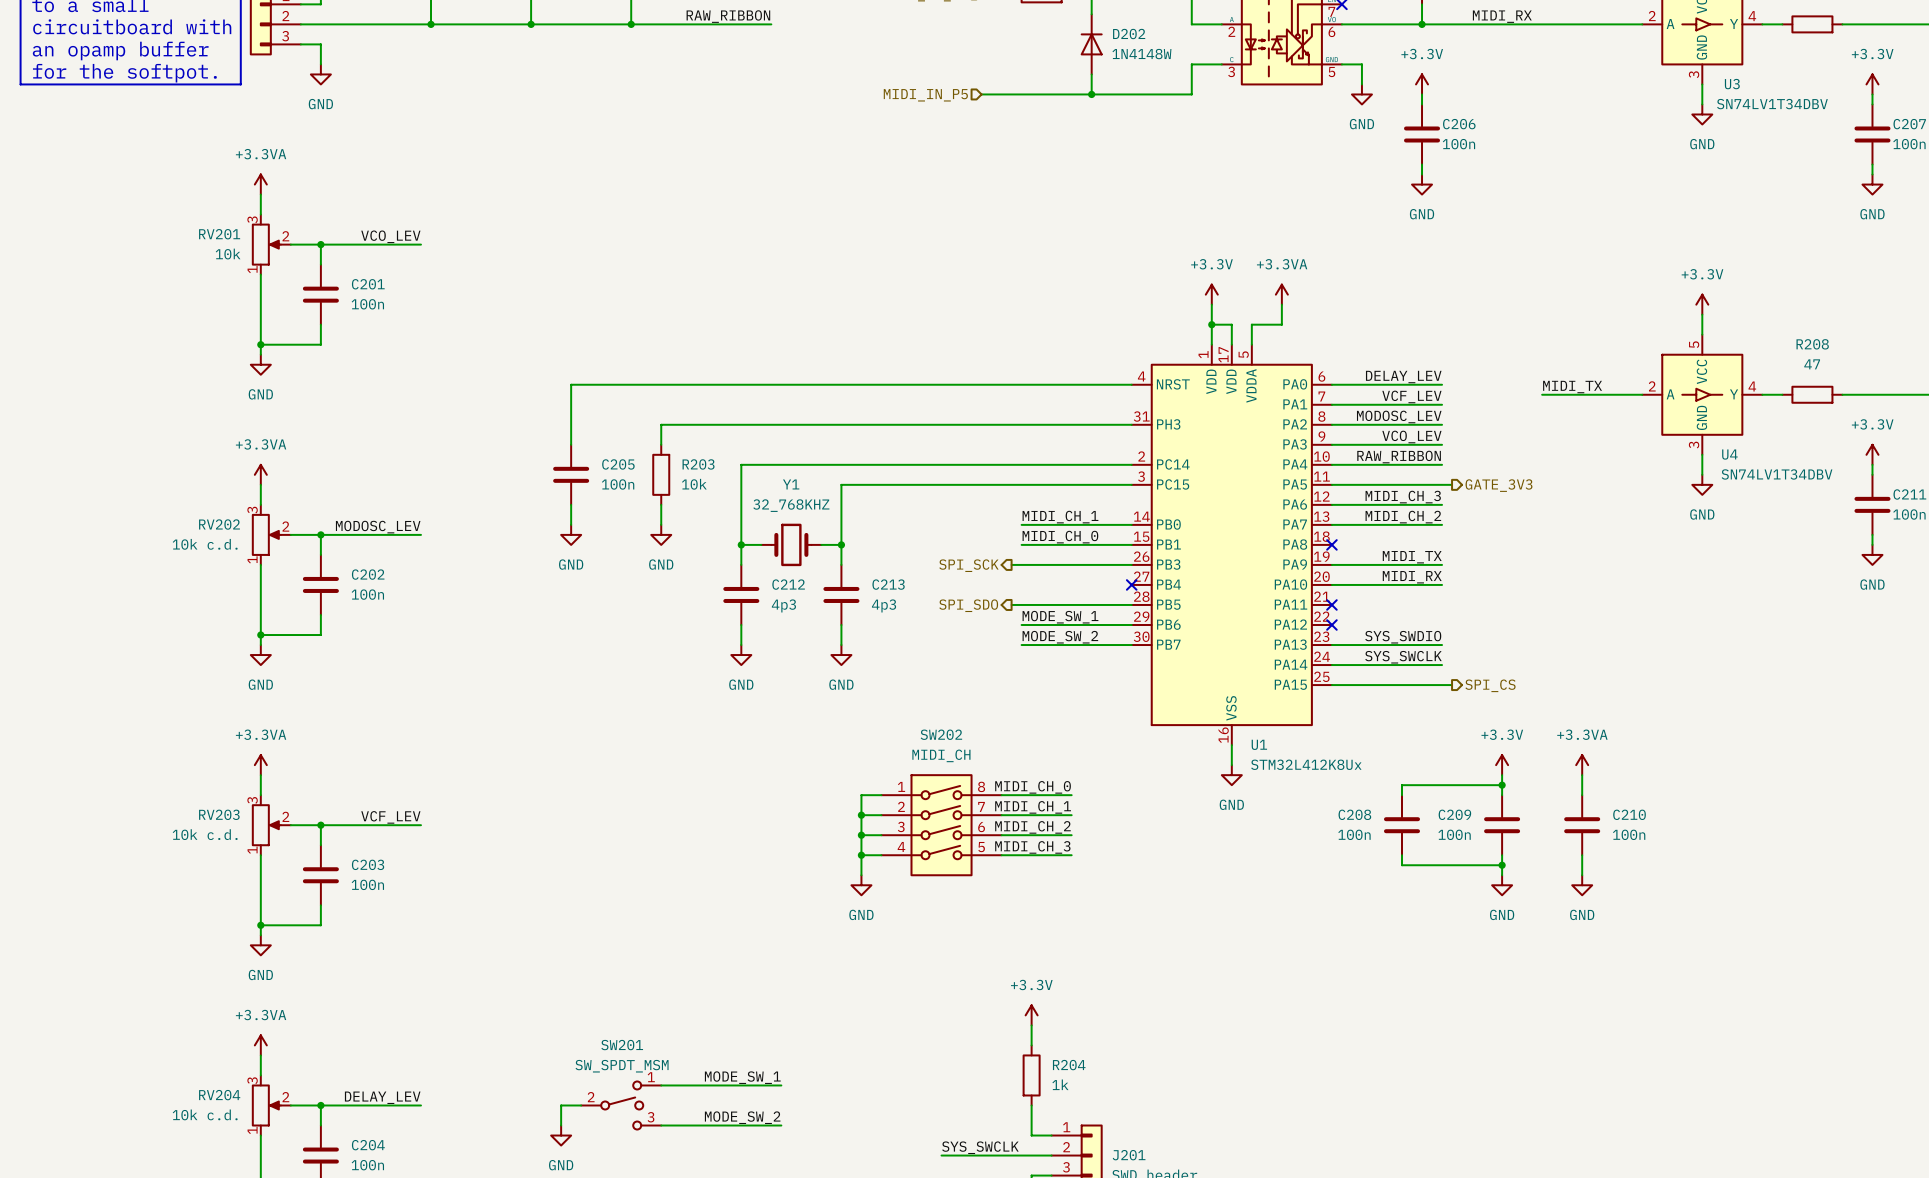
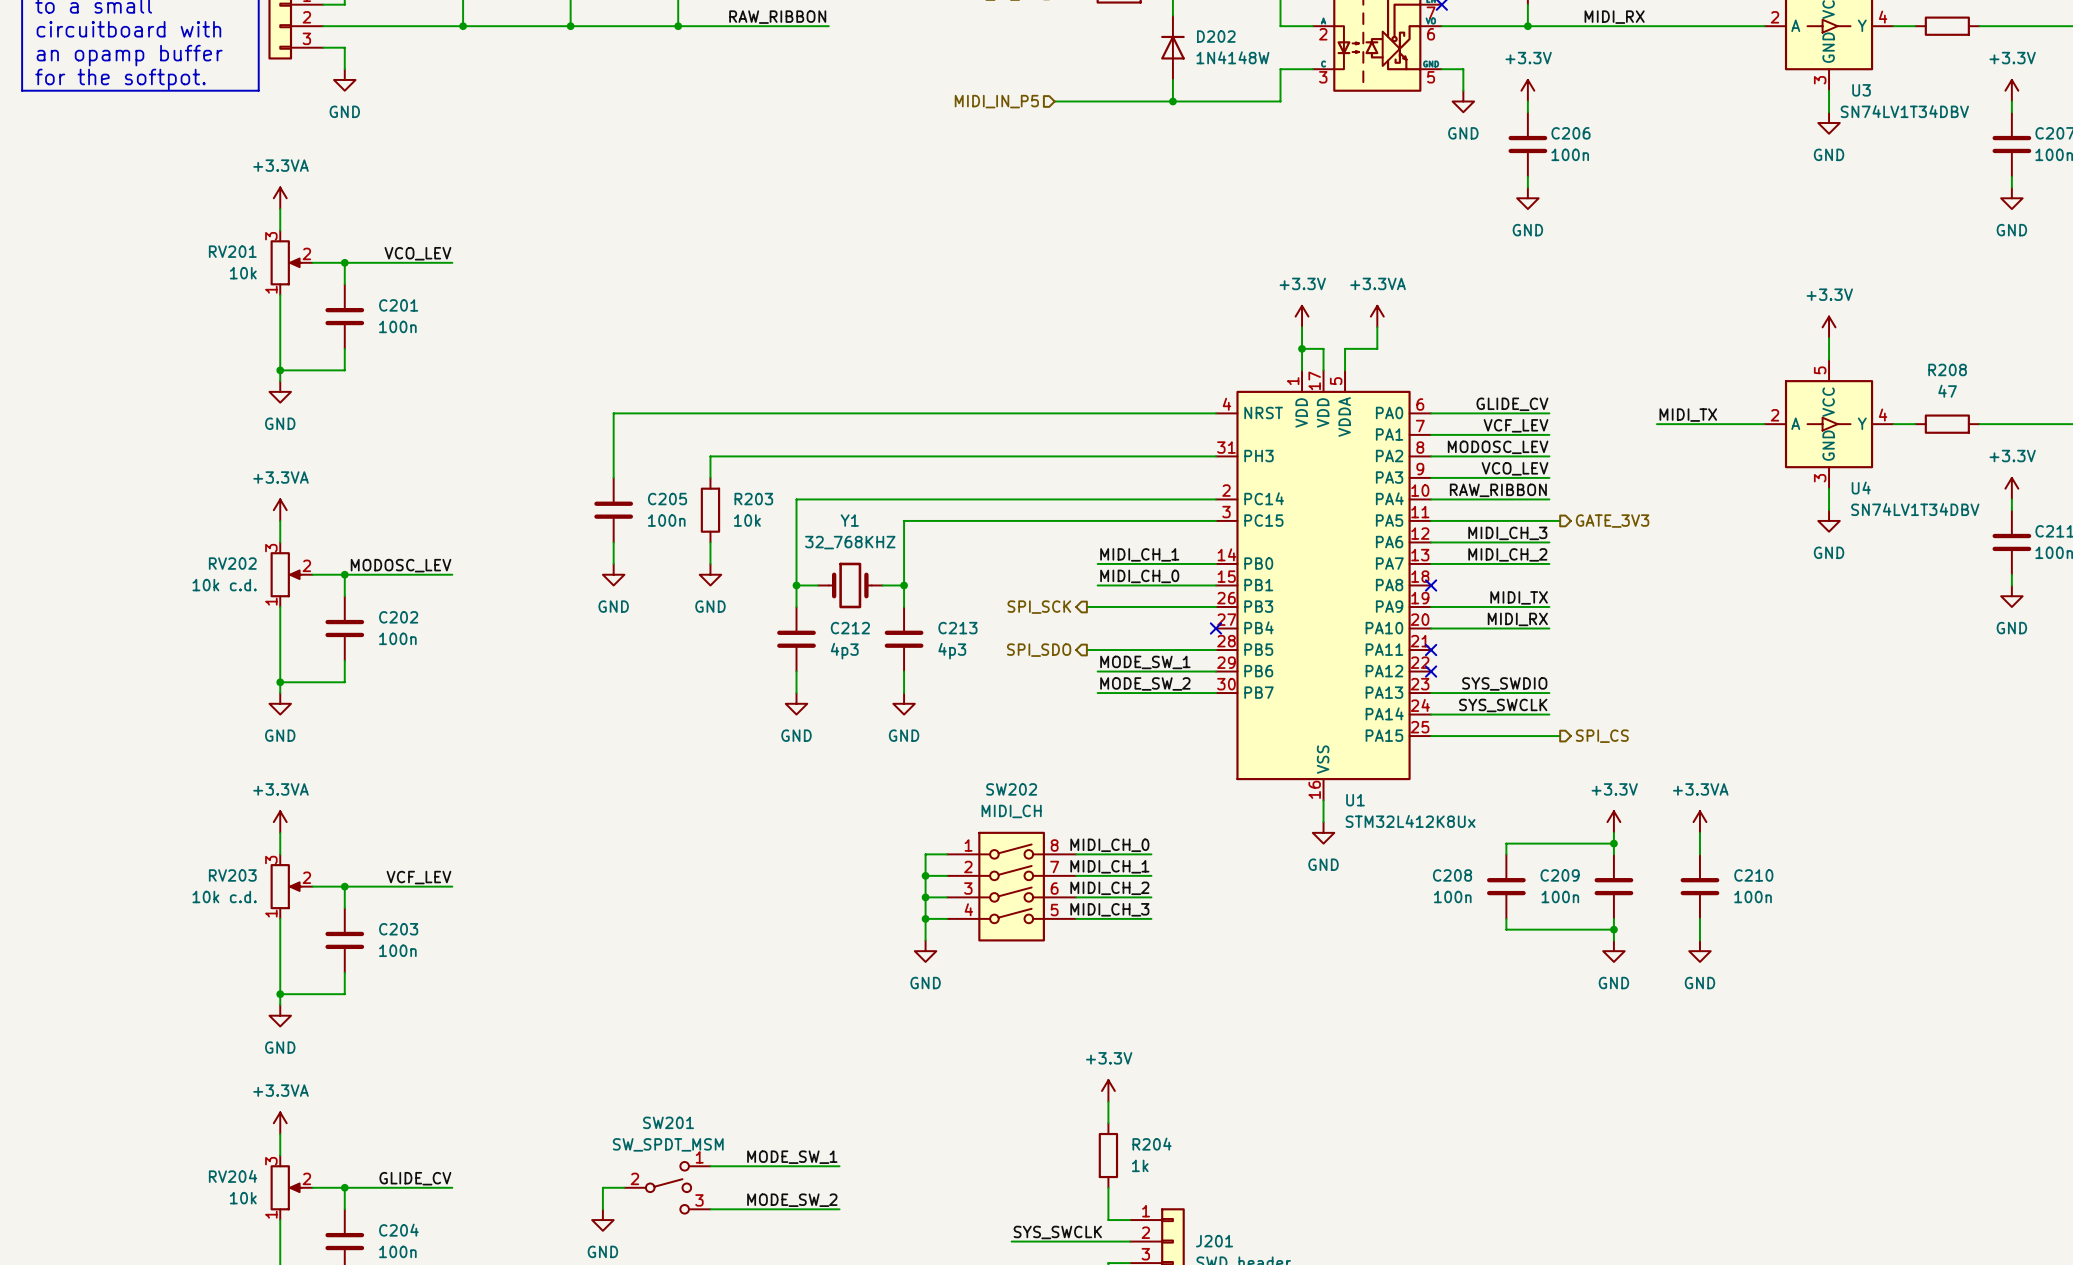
label: DELAY_LEV (1403, 377) -> GLIDE_CV (1512, 404)
label: DELAY_LEV (382, 1097) -> GLIDE_CV (415, 1178)
RV204 value: 10k c.d. (205, 1114) -> 10k (243, 1198)

